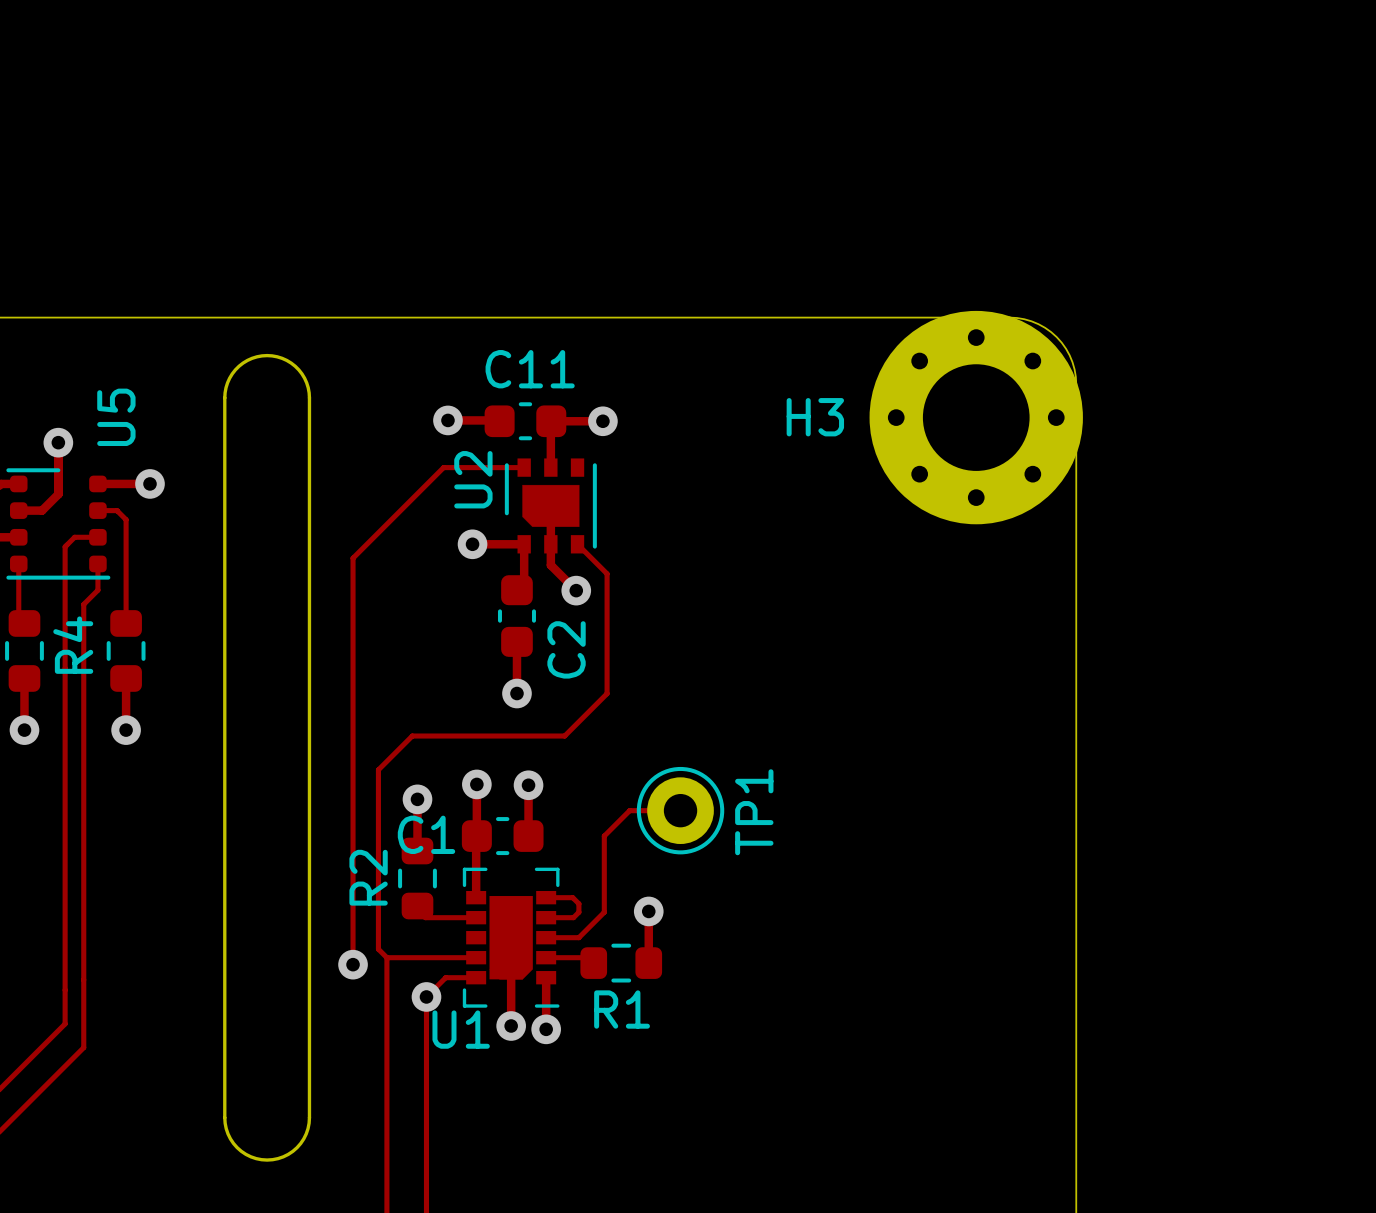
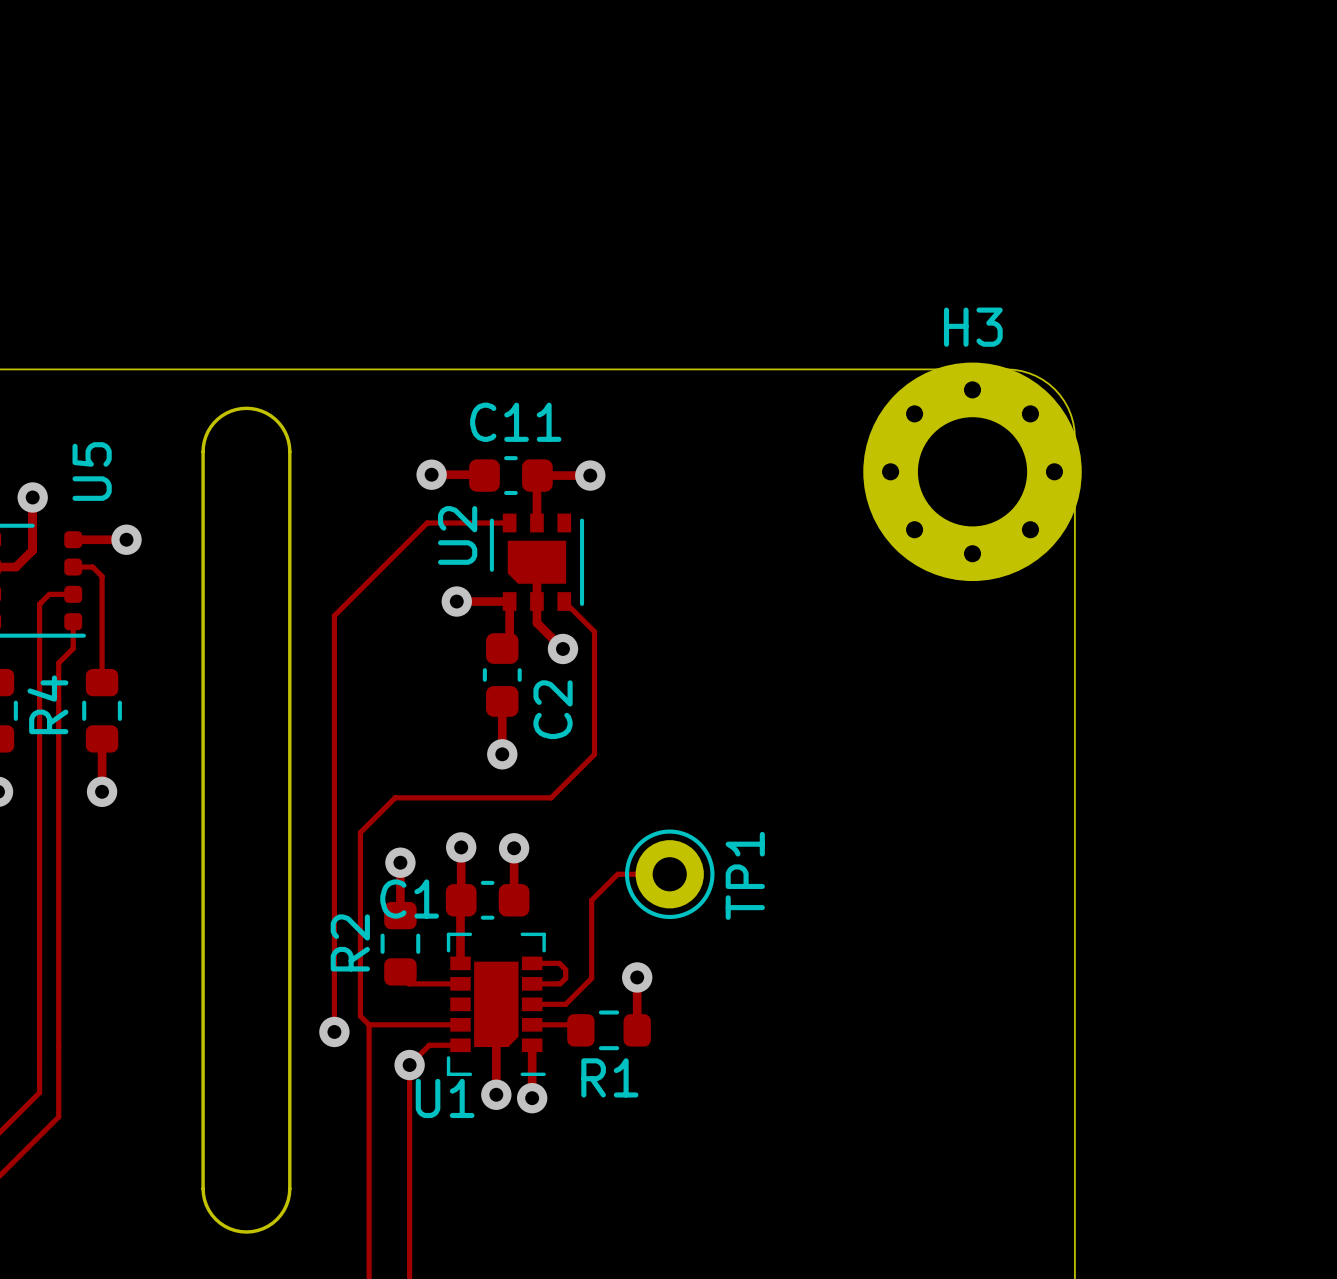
H3 name position: H3 (815, 417) -> H3 (973, 327)

